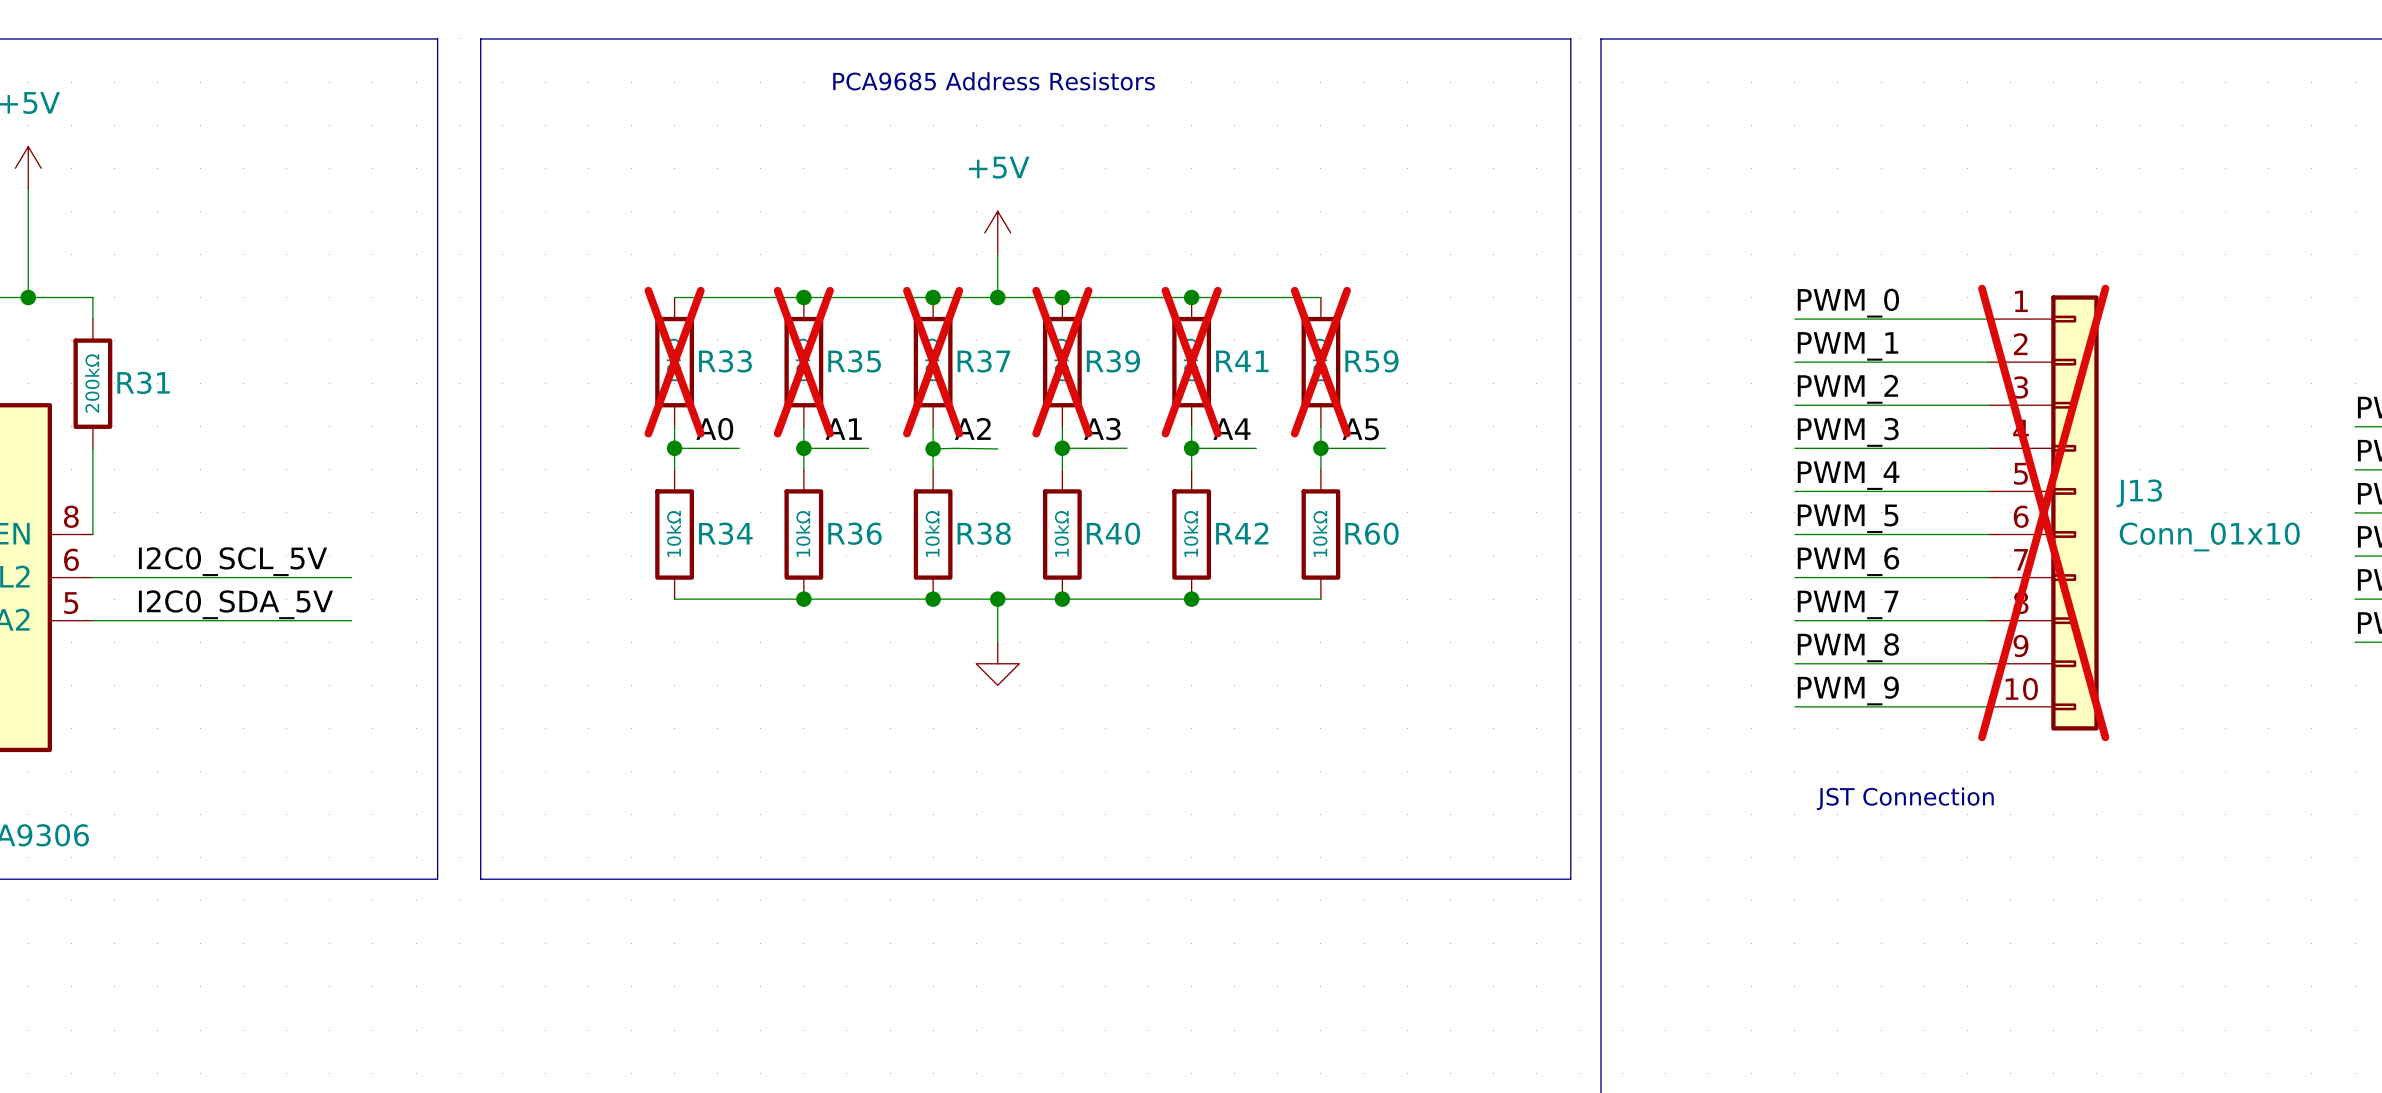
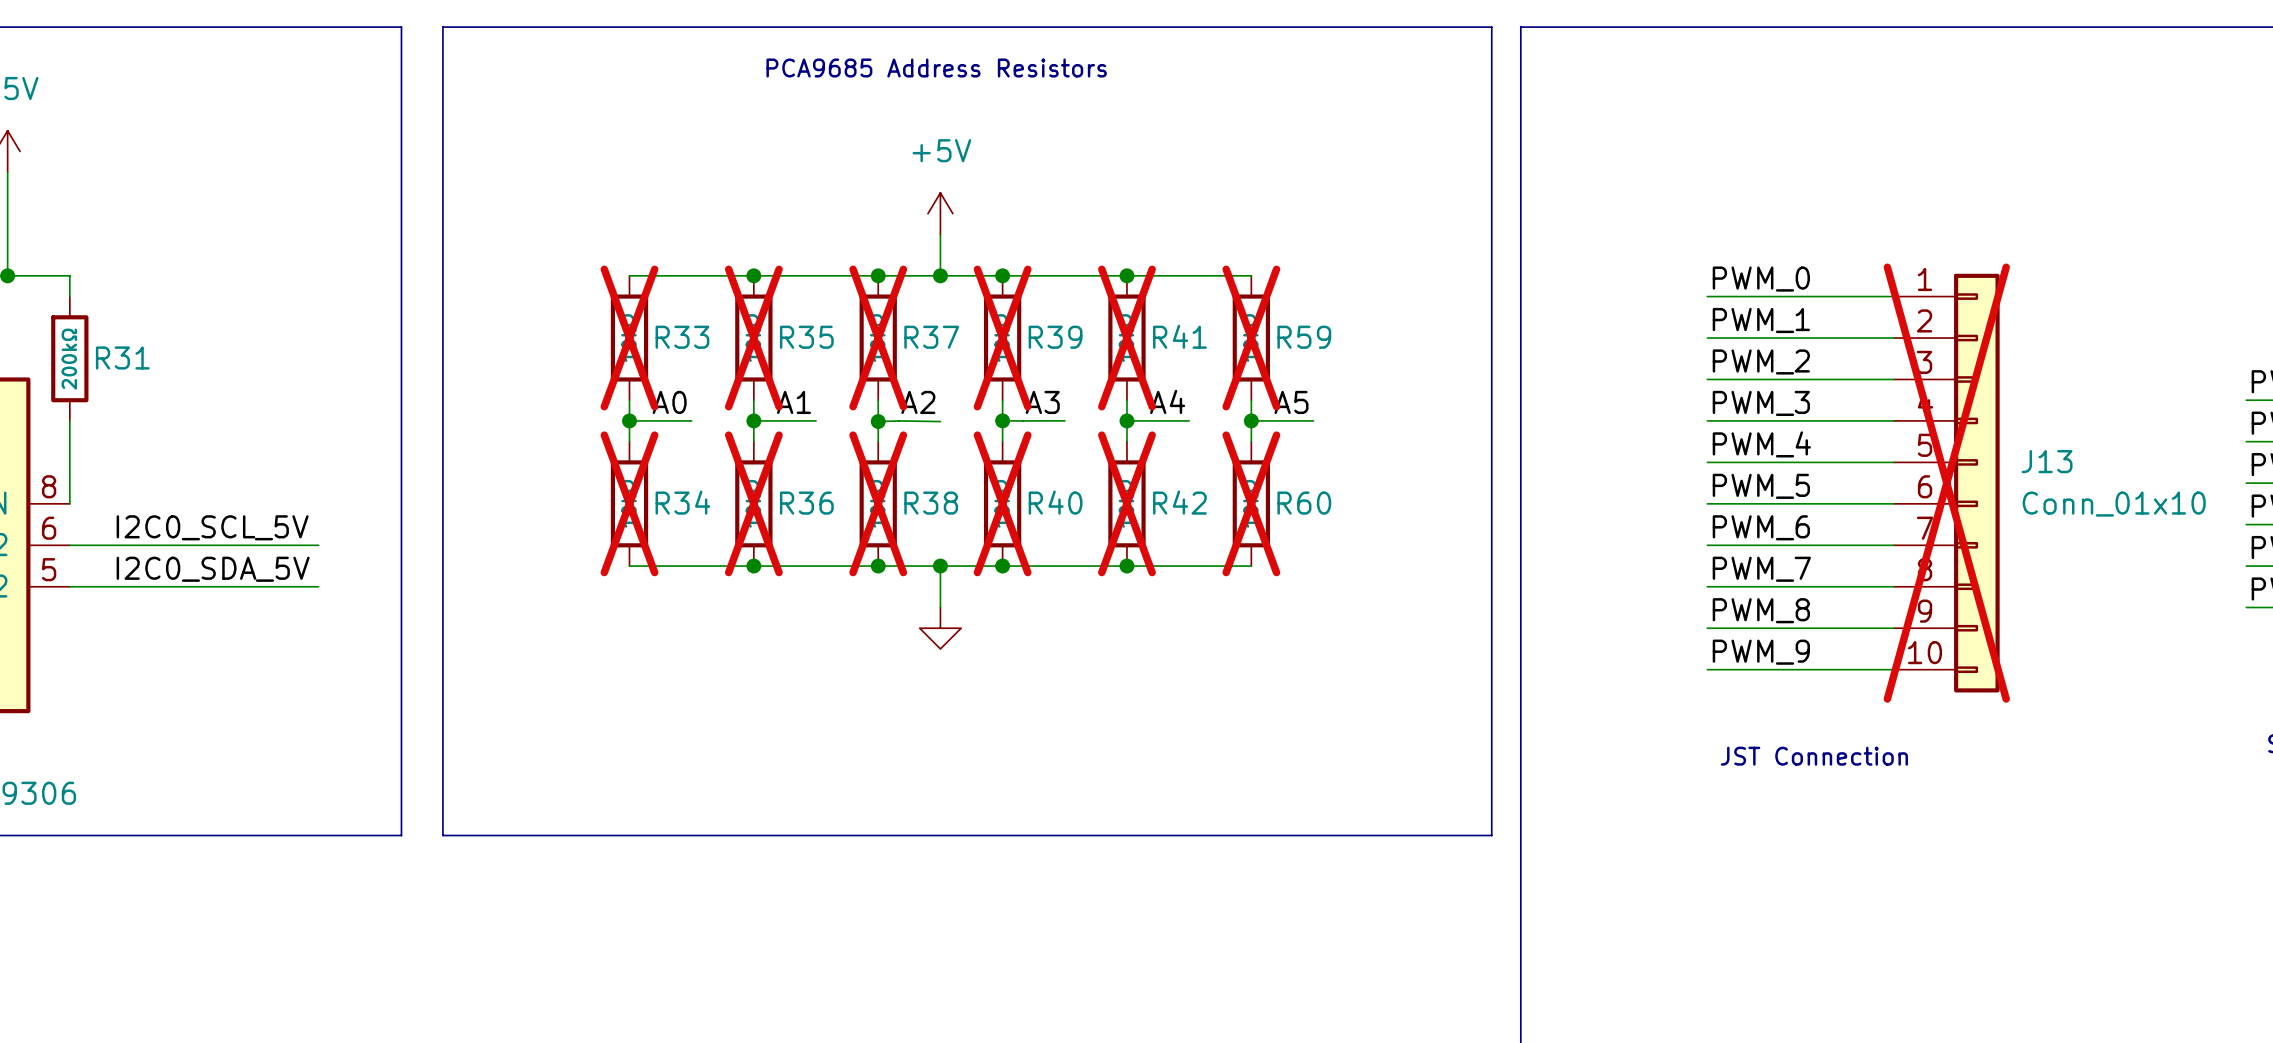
R34 do-not-place cross: none -> (629, 503)
R36 do-not-place cross: none -> (753, 503)
R38 do-not-place cross: none -> (878, 503)
R40 do-not-place cross: none -> (1002, 503)
R42 do-not-place cross: none -> (1126, 503)
R60 do-not-place cross: none -> (1251, 503)

